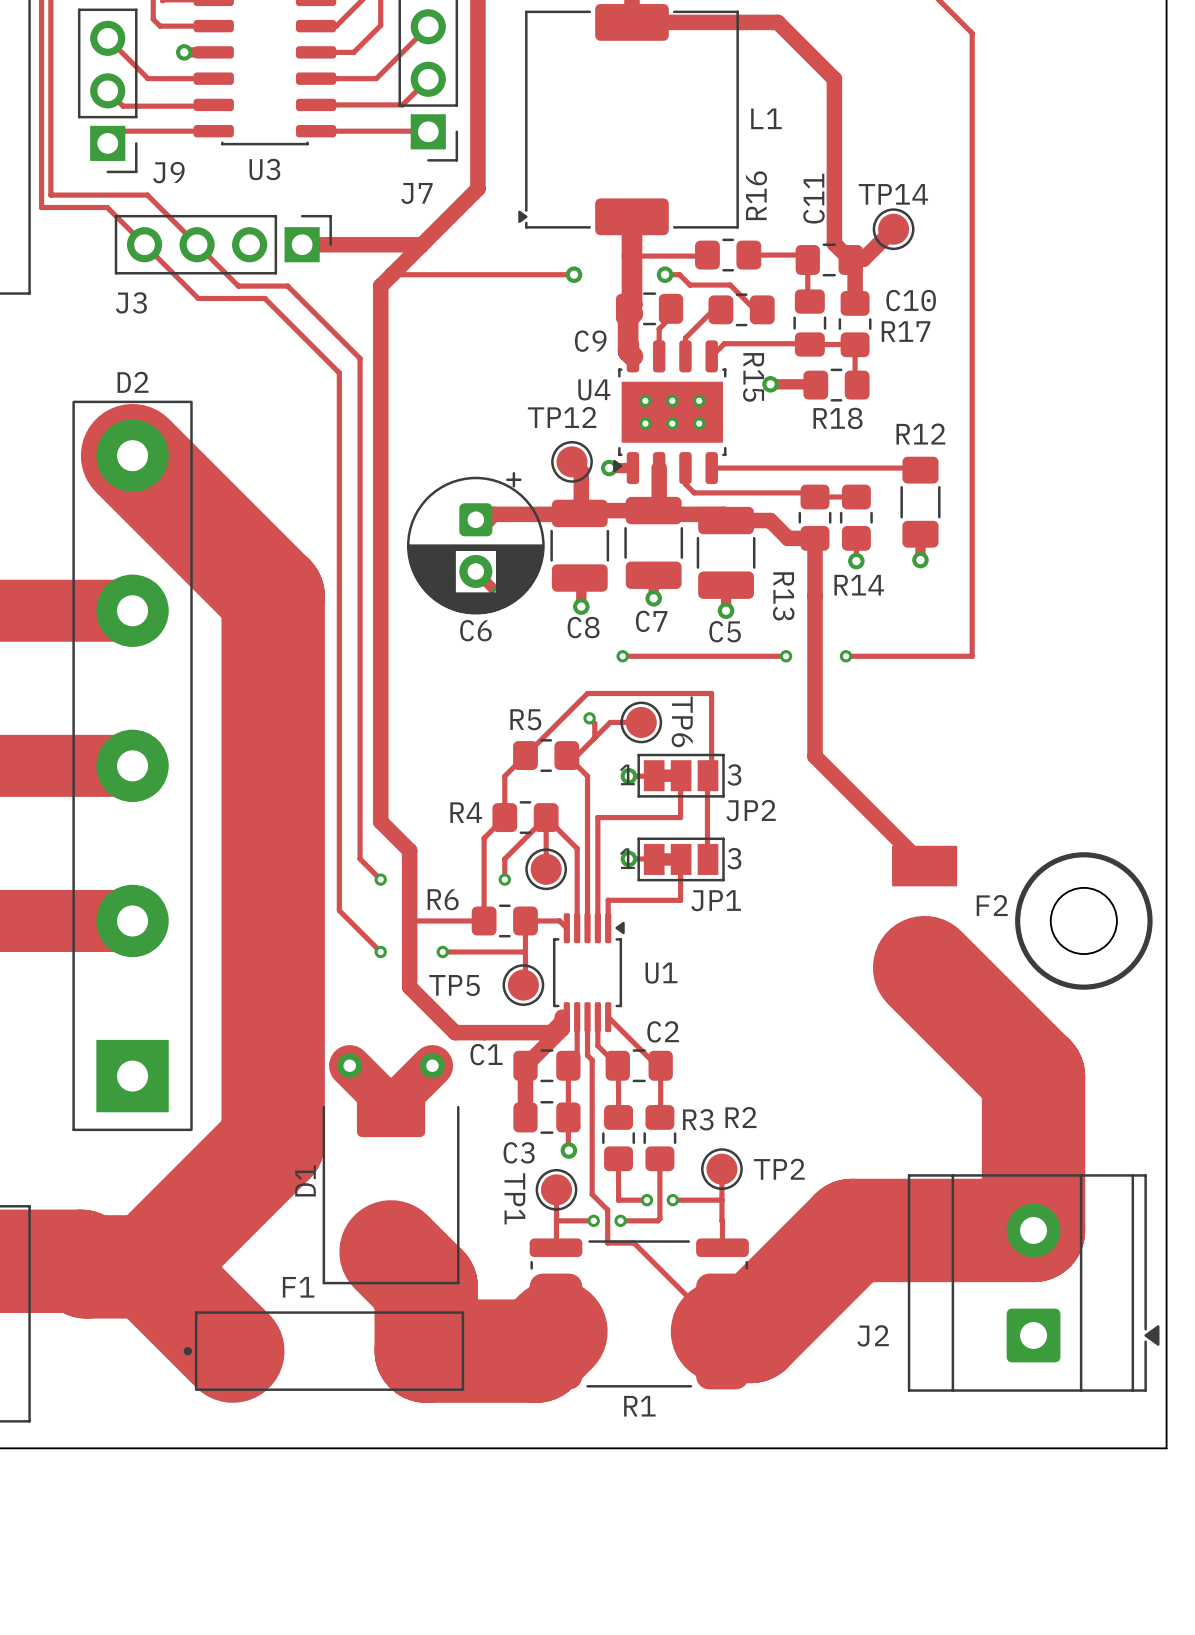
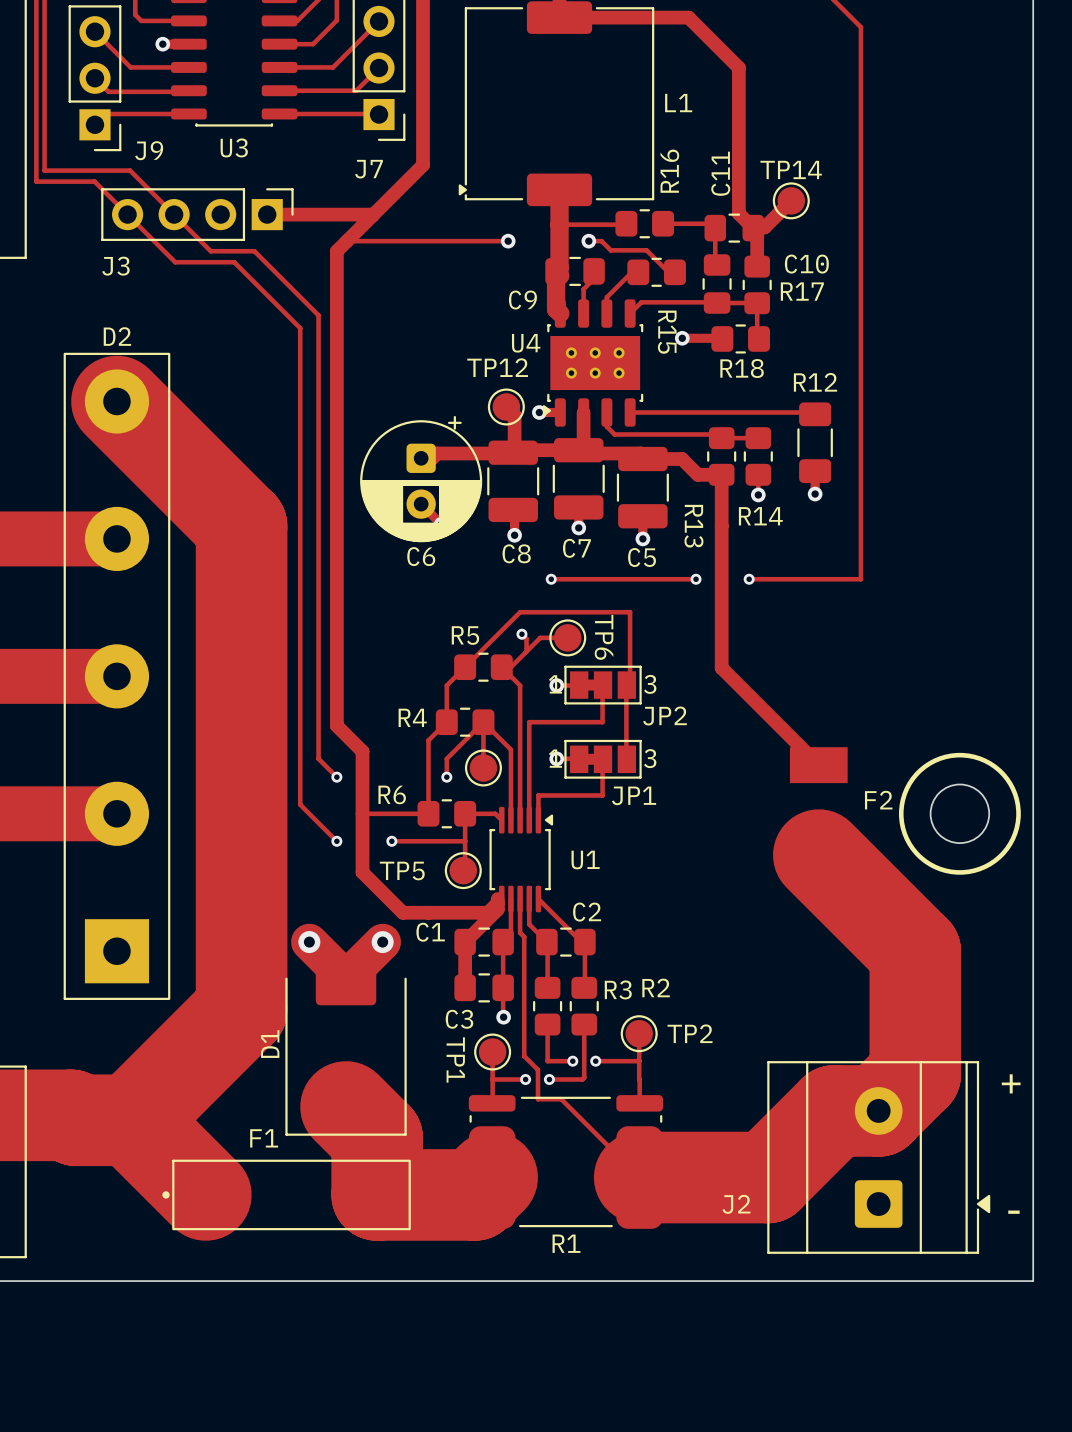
track: (1033, 1214) (1033, 1230) (851, 1230) (750, 1331) -> (915, 1074) (878, 1110) (834, 1110) (767, 1177) (664, 1177)
text: none -> + (1011, 1083)
J2 position: (1033, 1282) -> (878, 1157)
text: none -> - (1013, 1212)

